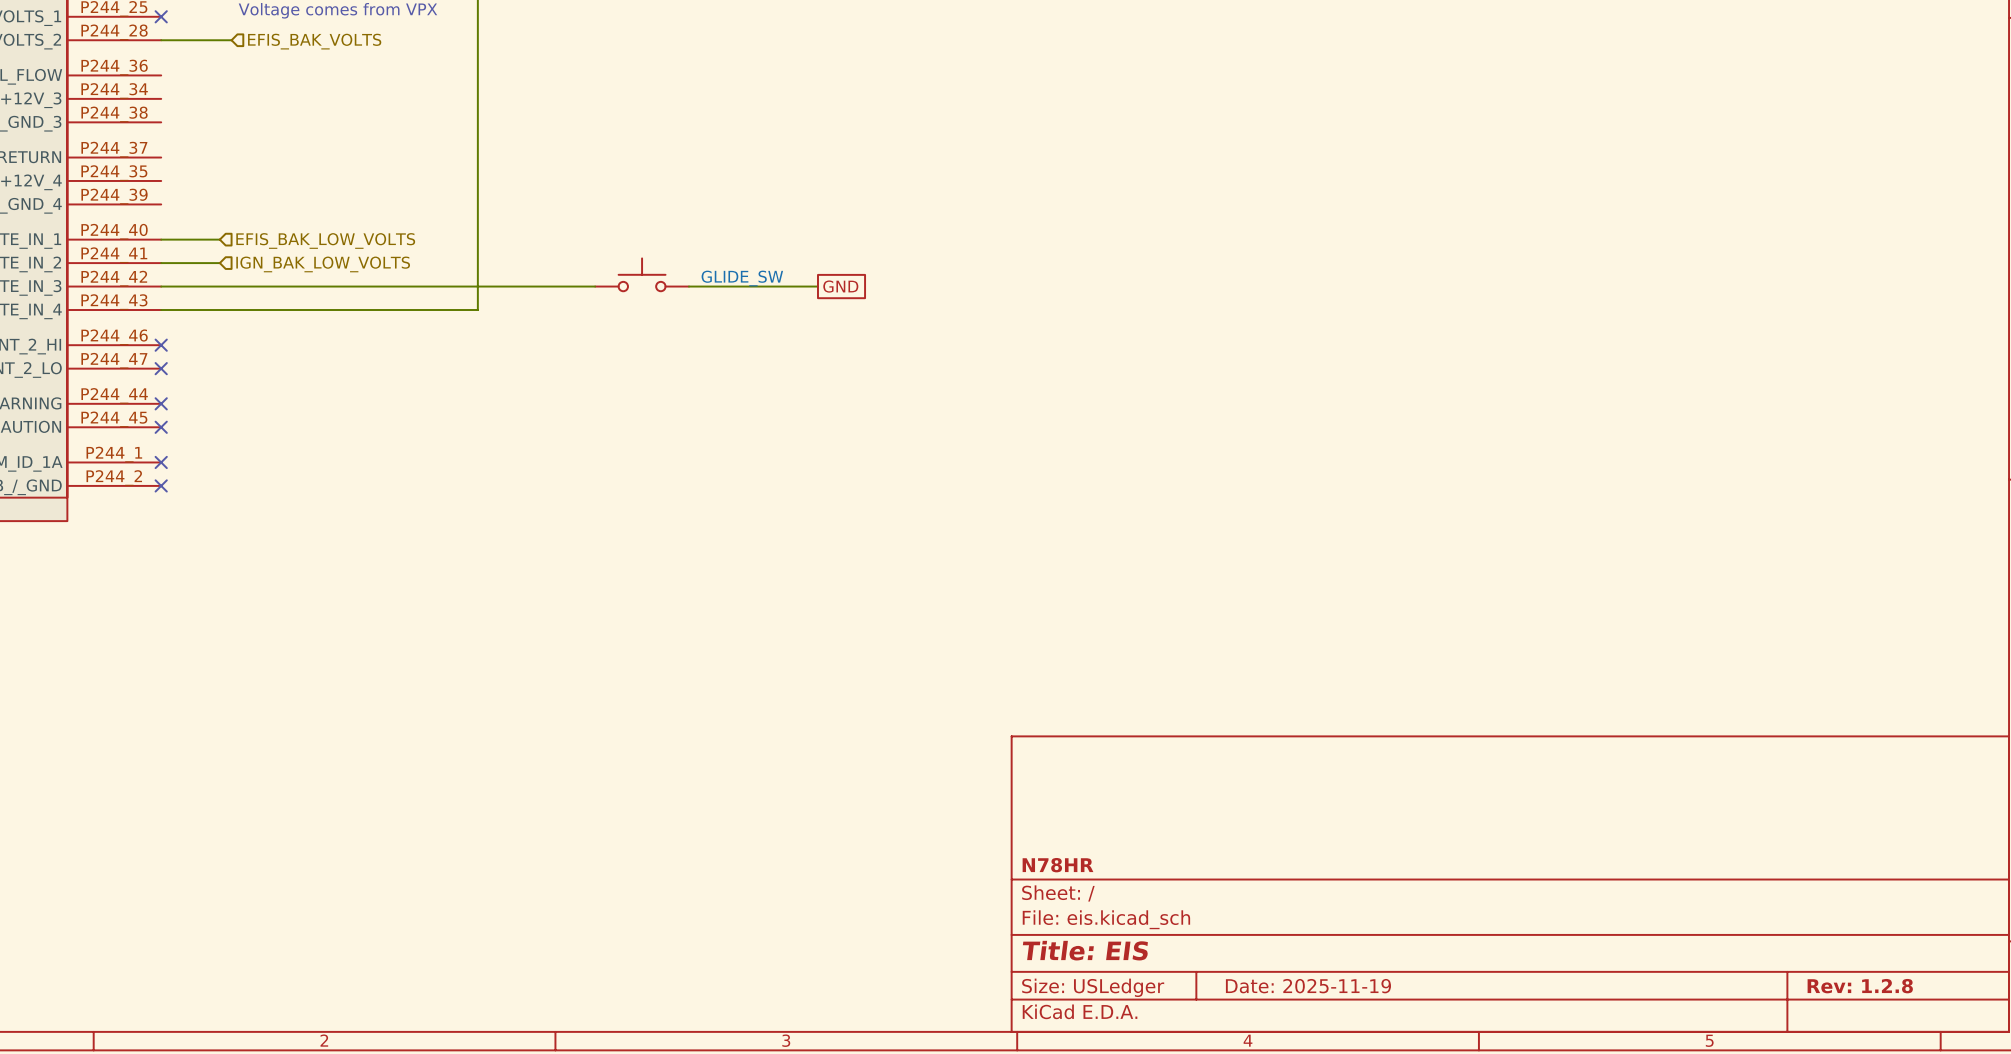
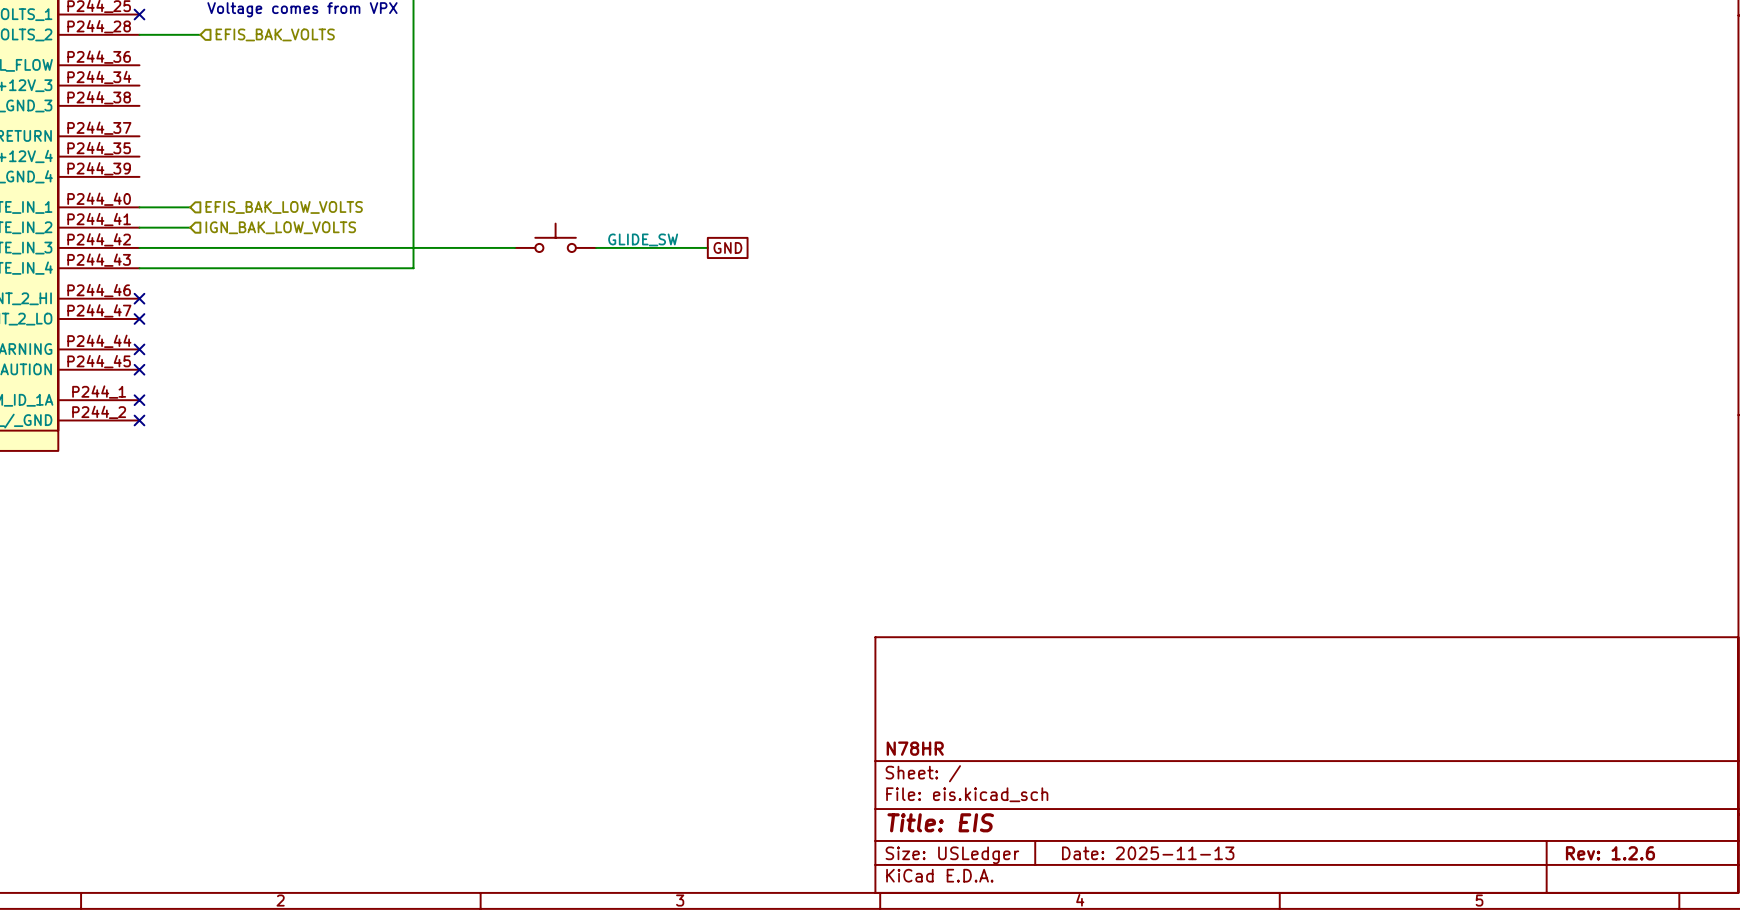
title block: Date: 2025-11-19 (1308, 986) -> Date: 2025-11-13 (1148, 853)
title block: Rev: 1.2.8 (1860, 986) -> Rev: 1.2.6 (1610, 853)

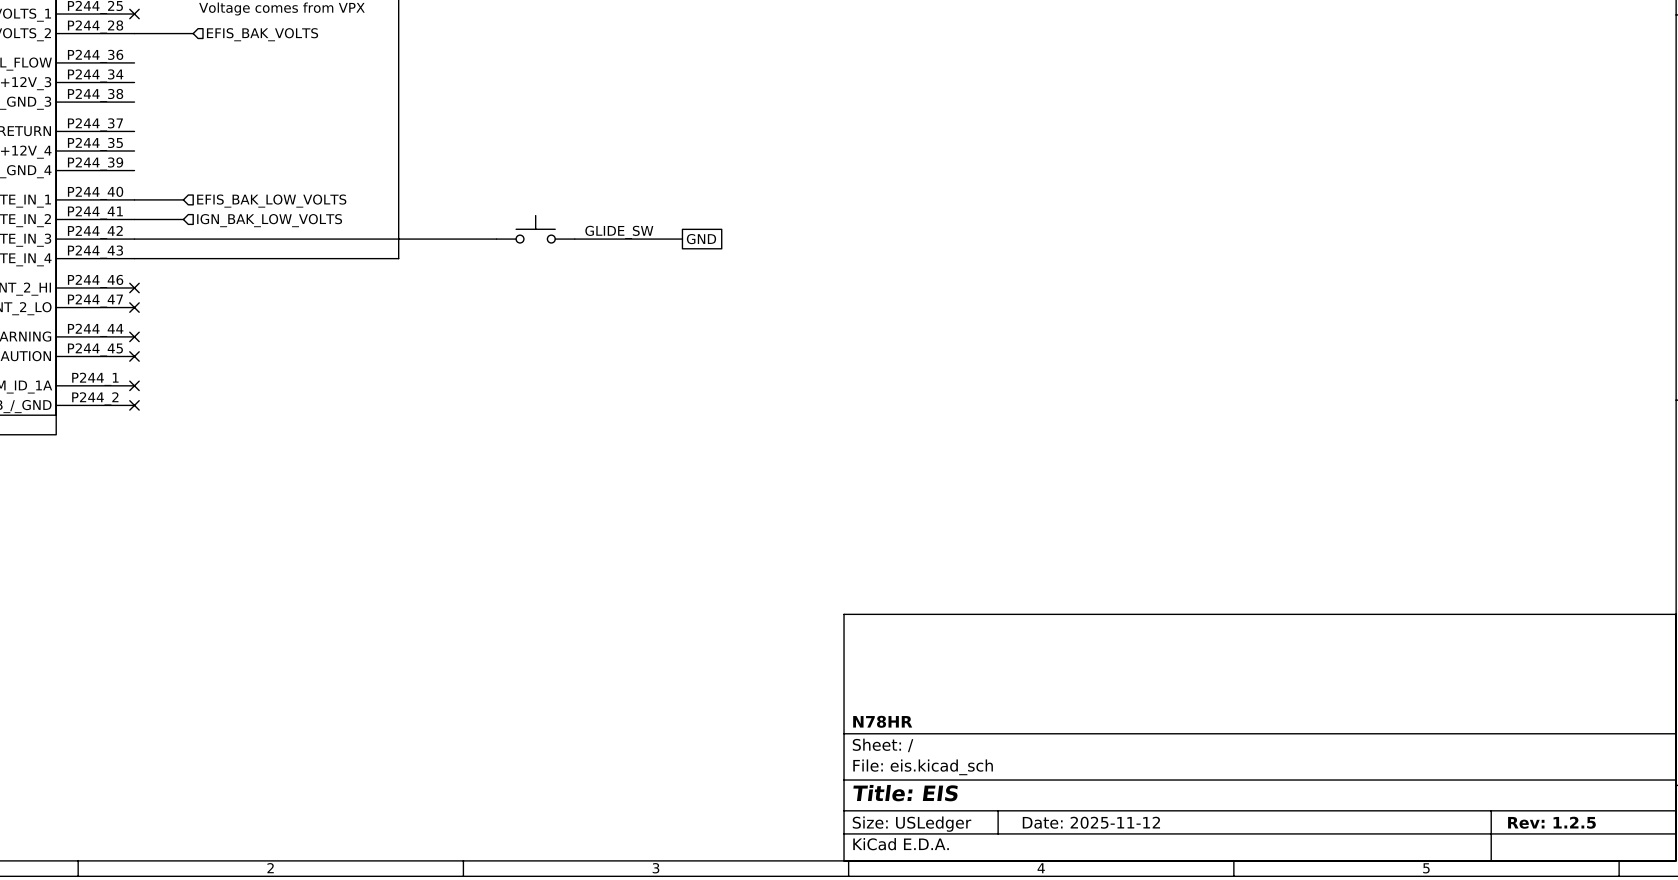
title block: Date: 2025-11-13 (1148, 853) -> Date: 2025-11-12 (1091, 822)
title block: Rev: 1.2.6 (1610, 853) -> Rev: 1.2.5 (1551, 822)

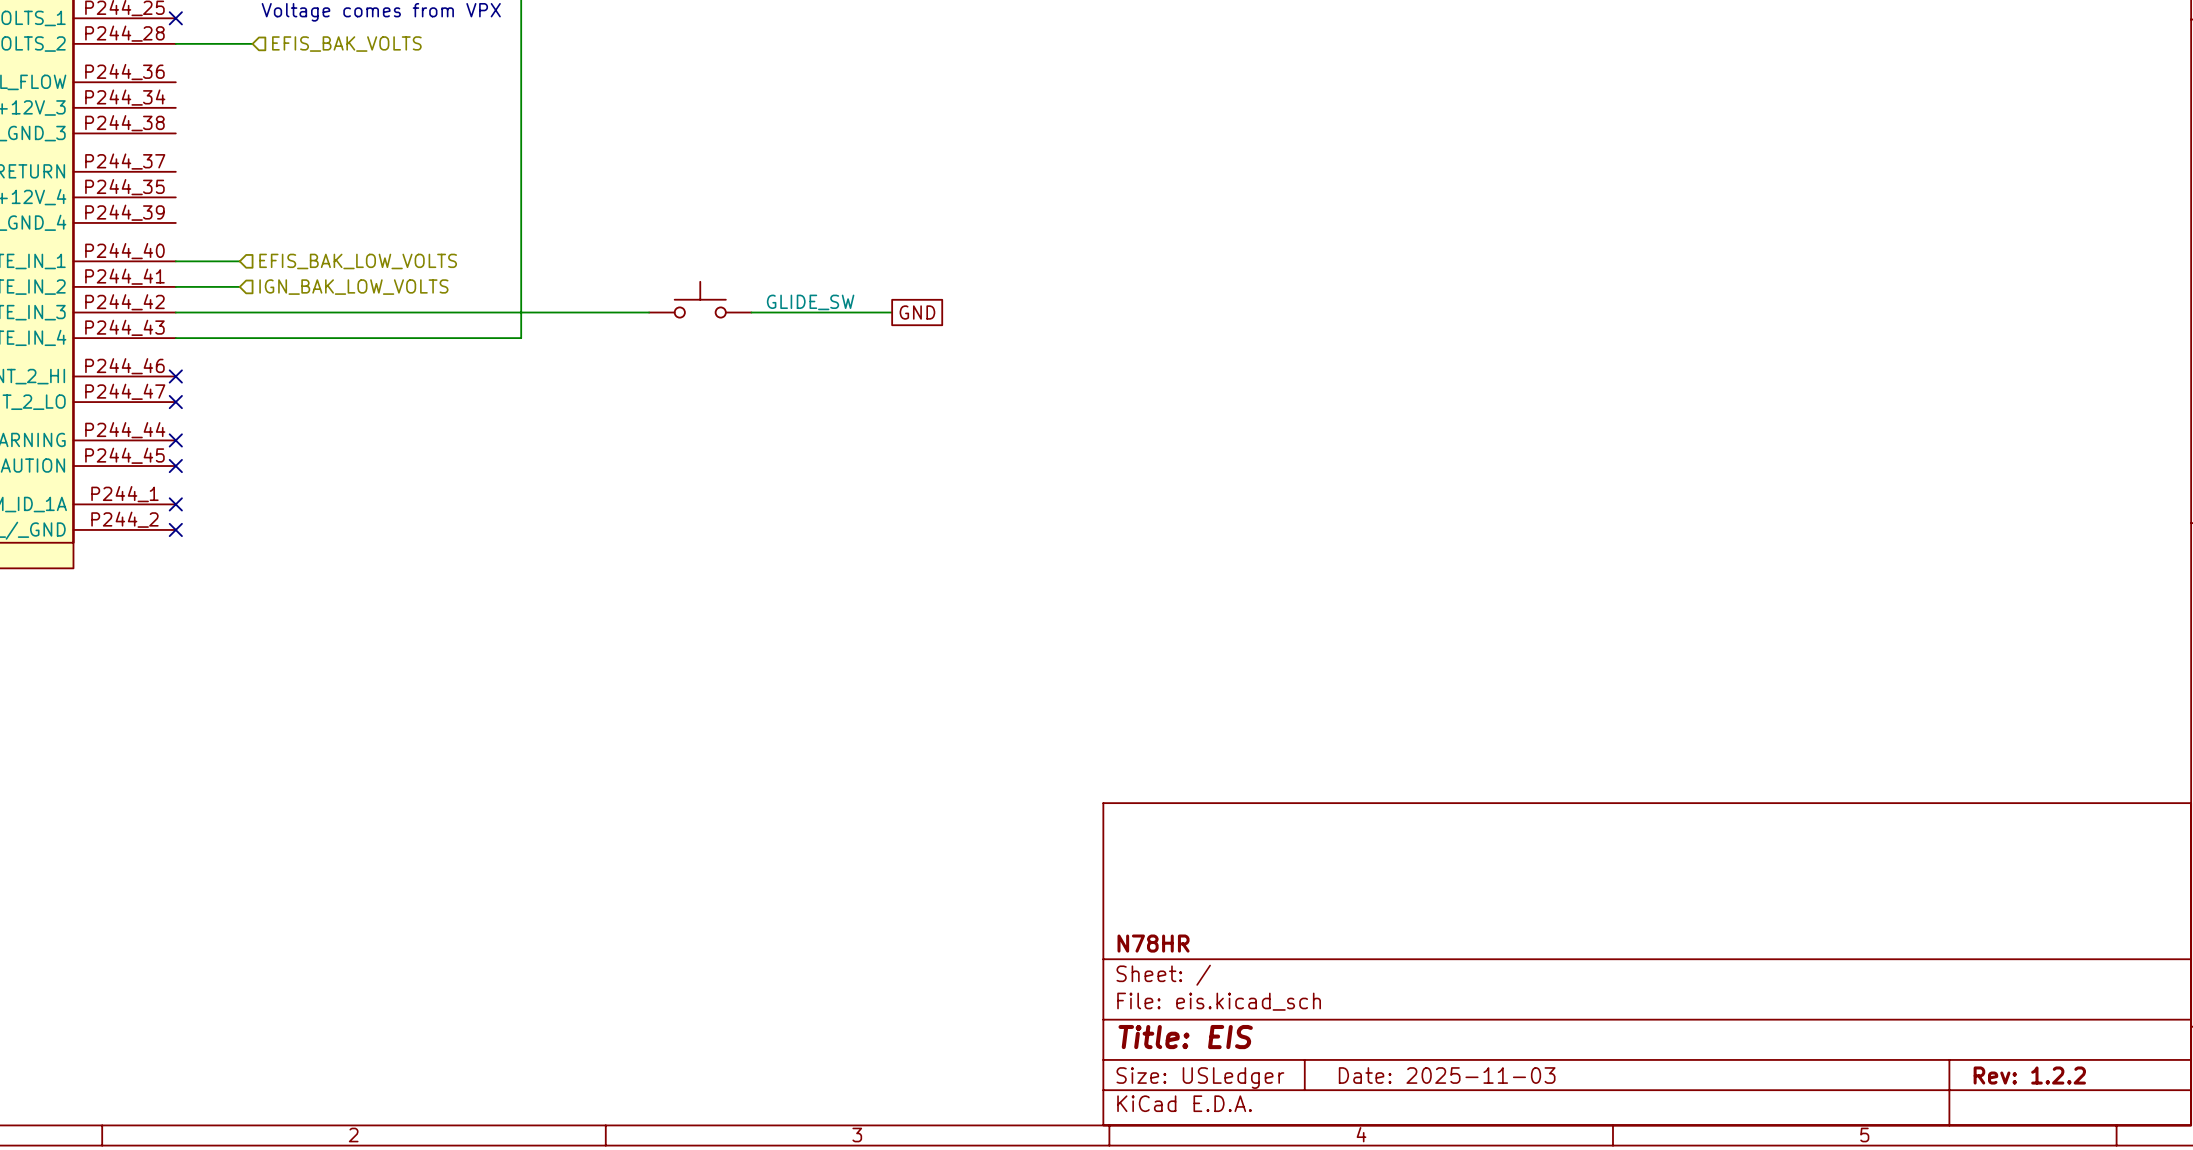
title block: Date: 2025-11-12 (1091, 822) -> Date: 2025-11-03 (1447, 1075)
title block: Rev: 1.2.5 (1551, 822) -> Rev: 1.2.2 (2029, 1075)

